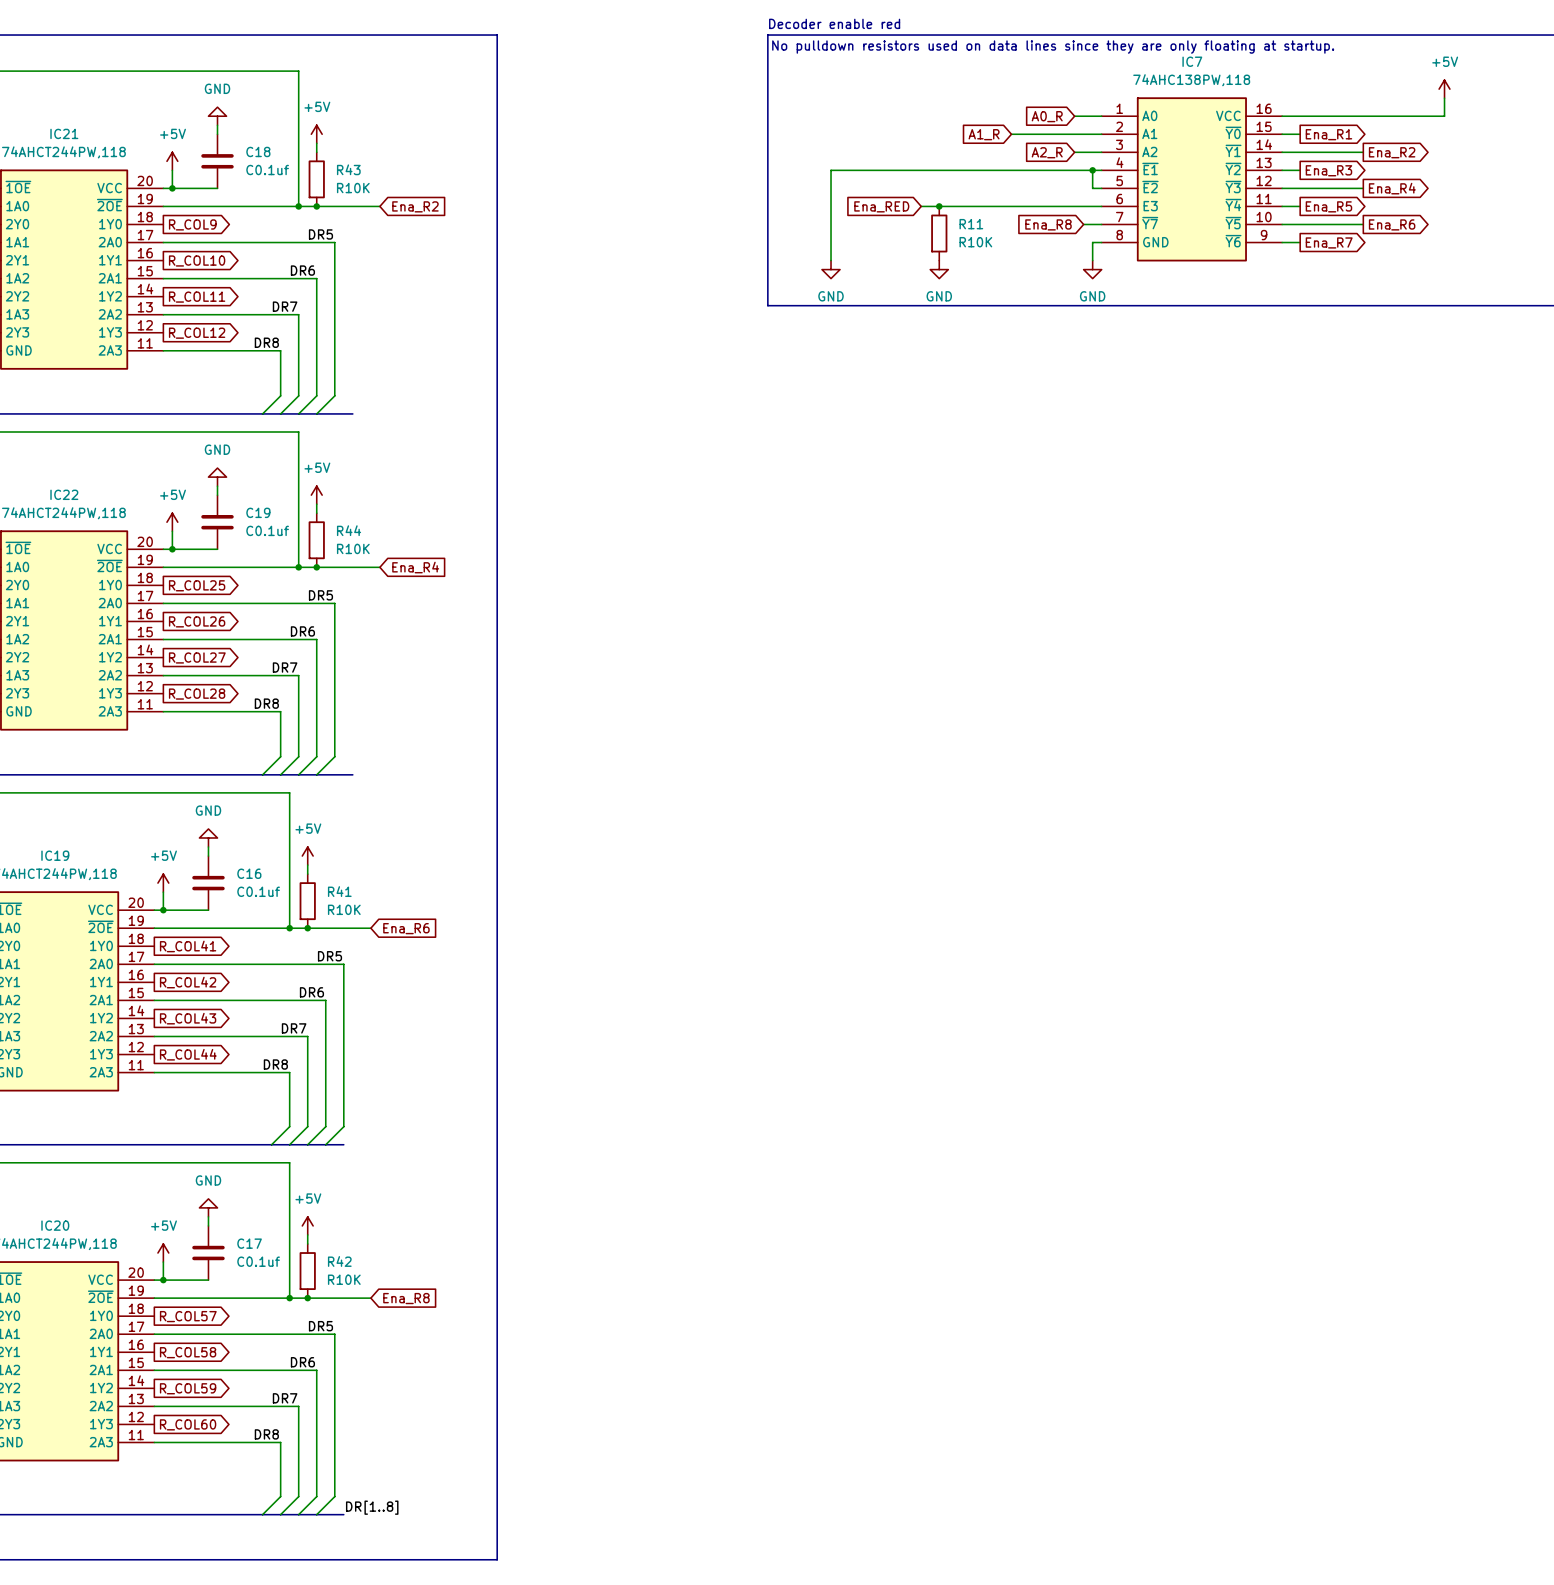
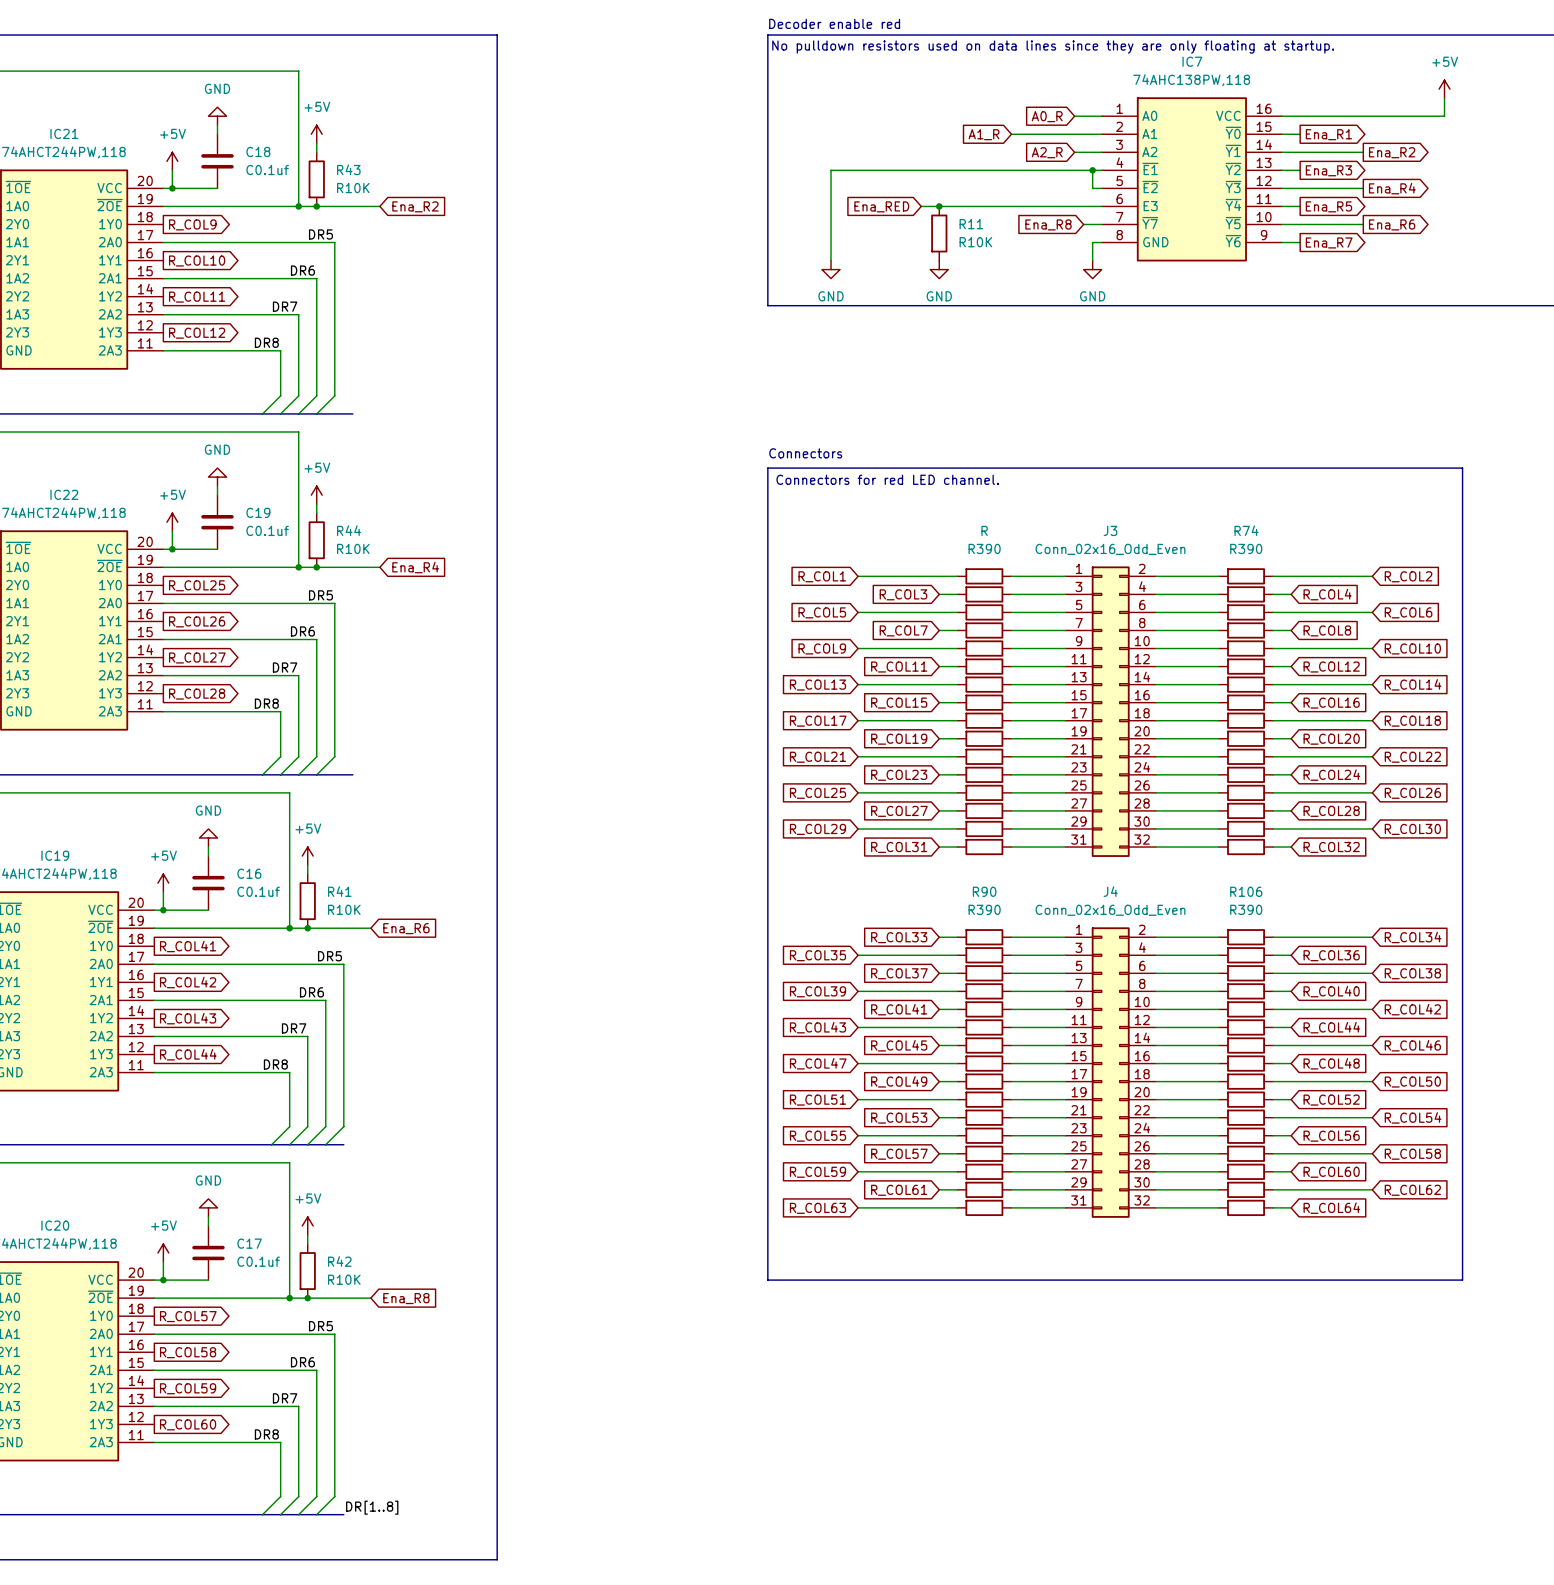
text: none -> Connectors (805, 453)
line: none -> (767, 468) (1462, 468) (1462, 1280) (767, 1280) (767, 468)
text: none -> Connectors for red LED channel. (887, 479)
global label: none -> R_COL1 (822, 576)
wire: none -> (858, 576) (957, 576)
R: none -> R390 (984, 576)
wire: none -> (1011, 576) (1065, 576)
wire: none -> (1155, 576) (1218, 576)
R74: none -> R390 (1246, 576)
wire: none -> (1273, 576) (1372, 576)
global label: none -> R_COL2 (1408, 576)
global label: none -> R_COL3 (903, 594)
wire: none -> (939, 594) (957, 594)
part: none -> (984, 594)
wire: none -> (1011, 594) (1065, 594)
wire: none -> (1155, 594) (1218, 594)
part: none -> (1246, 594)
wire: none -> (1273, 594) (1291, 594)
global label: none -> R_COL4 (1327, 594)
global label: none -> R_COL5 (822, 612)
wire: none -> (858, 612) (957, 612)
part: none -> (984, 612)
wire: none -> (1011, 612) (1065, 612)
wire: none -> (1155, 612) (1218, 612)
part: none -> (1246, 612)
wire: none -> (1273, 612) (1372, 612)
global label: none -> R_COL6 (1408, 612)
global label: none -> R_COL7 (903, 630)
wire: none -> (939, 630) (957, 630)
part: none -> (984, 630)
wire: none -> (1011, 630) (1065, 630)
wire: none -> (1155, 630) (1218, 630)
part: none -> (1246, 630)
wire: none -> (1273, 630) (1291, 630)
global label: none -> R_COL8 (1327, 630)
global label: none -> R_COL9 (822, 648)
wire: none -> (858, 648) (957, 648)
part: none -> (984, 648)
wire: none -> (1011, 648) (1065, 648)
wire: none -> (1155, 648) (1218, 648)
part: none -> (1246, 648)
wire: none -> (1273, 648) (1372, 648)
global label: none -> R_COL10 (1412, 648)
wire: none -> (939, 666) (957, 666)
part: none -> (984, 666)
wire: none -> (1011, 666) (1065, 666)
wire: none -> (1155, 666) (1218, 666)
part: none -> (1246, 666)
wire: none -> (1273, 666) (1291, 666)
global label: none -> R_COL11 (899, 667)
global label: none -> R_COL12 (1331, 667)
wire: none -> (858, 684) (957, 684)
part: none -> (984, 684)
wire: none -> (1011, 684) (1065, 684)
wire: none -> (1155, 684) (1218, 684)
part: none -> (1246, 684)
wire: none -> (1273, 684) (1372, 684)
global label: none -> R_COL14 (1413, 684)
global label: none -> R_COL13 (817, 685)
wire: none -> (939, 702) (957, 702)
part: none -> (984, 702)
wire: none -> (1011, 702) (1065, 702)
wire: none -> (1155, 702) (1218, 702)
part: none -> (1246, 702)
wire: none -> (1273, 702) (1291, 702)
global label: none -> R_COL15 (899, 703)
global label: none -> R_COL16 (1331, 703)
J3: none -> Conn_02x16_Odd_Even (1110, 711)
wire: none -> (858, 720) (957, 720)
part: none -> (984, 720)
wire: none -> (1011, 720) (1065, 720)
wire: none -> (1155, 720) (1218, 720)
part: none -> (1246, 720)
wire: none -> (1273, 720) (1372, 720)
global label: none -> R_COL17 (818, 721)
global label: none -> R_COL18 (1412, 721)
wire: none -> (939, 738) (957, 738)
part: none -> (984, 738)
wire: none -> (1011, 738) (1065, 738)
wire: none -> (1155, 738) (1218, 738)
part: none -> (1246, 738)
wire: none -> (1273, 738) (1291, 738)
global label: none -> R_COL19 (899, 739)
global label: none -> R_COL20 (1331, 739)
wire: none -> (858, 756) (957, 756)
part: none -> (984, 756)
wire: none -> (1011, 756) (1065, 756)
wire: none -> (1155, 756) (1218, 756)
part: none -> (1246, 756)
wire: none -> (1273, 756) (1372, 756)
global label: none -> R_COL21 (817, 757)
global label: none -> R_COL22 (1412, 757)
wire: none -> (939, 774) (957, 774)
part: none -> (984, 774)
wire: none -> (1011, 774) (1065, 774)
wire: none -> (1155, 774) (1218, 774)
part: none -> (1246, 774)
wire: none -> (1273, 774) (1291, 774)
global label: none -> R_COL23 (899, 775)
global label: none -> R_COL24 (1331, 775)
wire: none -> (858, 792) (957, 792)
part: none -> (984, 792)
wire: none -> (1011, 792) (1065, 792)
wire: none -> (1155, 792) (1218, 792)
part: none -> (1246, 792)
wire: none -> (1273, 792) (1372, 792)
global label: none -> R_COL25 (817, 793)
global label: none -> R_COL26 (1412, 793)
wire: none -> (939, 810) (957, 810)
part: none -> (984, 810)
wire: none -> (1011, 810) (1065, 810)
wire: none -> (1155, 810) (1218, 810)
part: none -> (1246, 810)
wire: none -> (1273, 810) (1291, 810)
global label: none -> R_COL27 (899, 811)
global label: none -> R_COL28 (1331, 811)
wire: none -> (858, 828) (957, 828)
part: none -> (984, 828)
wire: none -> (1011, 828) (1065, 828)
wire: none -> (1155, 828) (1218, 828)
part: none -> (1246, 828)
wire: none -> (1273, 828) (1372, 828)
global label: none -> R_COL29 (817, 829)
global label: none -> R_COL30 (1412, 829)
global label: none -> R_COL31 (899, 847)
wire: none -> (939, 847) (957, 847)
part: none -> (984, 847)
wire: none -> (1011, 847) (1065, 847)
wire: none -> (1155, 847) (1218, 847)
part: none -> (1246, 847)
wire: none -> (1273, 847) (1291, 847)
global label: none -> R_COL32 (1331, 847)
global label: none -> R_COL33 (899, 937)
wire: none -> (939, 937) (957, 937)
R90: none -> R390 (984, 937)
wire: none -> (1011, 937) (1065, 937)
wire: none -> (1155, 937) (1218, 937)
R106: none -> R390 (1246, 937)
wire: none -> (1273, 937) (1372, 937)
global label: none -> R_COL34 (1413, 937)
global label: none -> R_COL35 (817, 955)
wire: none -> (858, 955) (957, 955)
part: none -> (984, 955)
wire: none -> (1011, 955) (1065, 955)
wire: none -> (1155, 955) (1218, 955)
part: none -> (1246, 955)
wire: none -> (1273, 955) (1291, 955)
global label: none -> R_COL36 (1331, 955)
global label: none -> R_COL37 (899, 973)
wire: none -> (939, 973) (957, 973)
part: none -> (984, 973)
wire: none -> (1011, 973) (1065, 973)
wire: none -> (1155, 973) (1218, 973)
part: none -> (1246, 973)
wire: none -> (1273, 973) (1372, 973)
global label: none -> R_COL38 (1412, 973)
global label: none -> R_COL39 (817, 991)
wire: none -> (858, 991) (957, 991)
part: none -> (984, 991)
wire: none -> (1011, 991) (1065, 991)
wire: none -> (1155, 991) (1218, 991)
part: none -> (1246, 991)
wire: none -> (1273, 991) (1291, 991)
global label: none -> R_COL40 (1331, 991)
global label: none -> R_COL41 (899, 1009)
wire: none -> (939, 1009) (957, 1009)
part: none -> (984, 1009)
wire: none -> (1011, 1009) (1065, 1009)
wire: none -> (1155, 1009) (1218, 1009)
part: none -> (1246, 1009)
wire: none -> (1273, 1009) (1372, 1009)
global label: none -> R_COL42 (1412, 1009)
global label: none -> R_COL43 (817, 1027)
wire: none -> (858, 1027) (957, 1027)
part: none -> (984, 1027)
wire: none -> (1011, 1027) (1065, 1027)
wire: none -> (1155, 1027) (1218, 1027)
part: none -> (1246, 1027)
wire: none -> (1273, 1027) (1291, 1027)
global label: none -> R_COL44 (1331, 1027)
global label: none -> R_COL45 (899, 1045)
wire: none -> (939, 1045) (957, 1045)
part: none -> (984, 1045)
wire: none -> (1011, 1045) (1065, 1045)
wire: none -> (1155, 1045) (1218, 1045)
part: none -> (1246, 1045)
wire: none -> (1273, 1045) (1372, 1045)
global label: none -> R_COL46 (1412, 1045)
global label: none -> R_COL47 (818, 1063)
wire: none -> (858, 1063) (957, 1063)
part: none -> (984, 1063)
wire: none -> (1011, 1063) (1065, 1063)
wire: none -> (1155, 1063) (1218, 1063)
part: none -> (1246, 1063)
wire: none -> (1273, 1063) (1291, 1063)
global label: none -> R_COL48 (1331, 1063)
J4: none -> Conn_02x16_Odd_Even (1110, 1072)
global label: none -> R_COL49 (899, 1081)
wire: none -> (939, 1081) (957, 1081)
part: none -> (984, 1081)
wire: none -> (1011, 1081) (1065, 1081)
wire: none -> (1155, 1081) (1218, 1081)
part: none -> (1246, 1081)
wire: none -> (1273, 1081) (1372, 1081)
global label: none -> R_COL50 (1412, 1082)
wire: none -> (858, 1099) (957, 1099)
part: none -> (984, 1099)
wire: none -> (1011, 1099) (1065, 1099)
wire: none -> (1155, 1099) (1218, 1099)
part: none -> (1246, 1099)
wire: none -> (1273, 1099) (1291, 1099)
global label: none -> R_COL51 (817, 1100)
global label: none -> R_COL52 (1331, 1100)
wire: none -> (939, 1117) (957, 1117)
part: none -> (984, 1117)
wire: none -> (1011, 1117) (1065, 1117)
wire: none -> (1155, 1117) (1218, 1117)
part: none -> (1246, 1117)
wire: none -> (1273, 1117) (1372, 1117)
global label: none -> R_COL54 (1413, 1117)
global label: none -> R_COL53 (899, 1118)
wire: none -> (858, 1135) (957, 1135)
part: none -> (984, 1135)
wire: none -> (1011, 1135) (1065, 1135)
wire: none -> (1155, 1135) (1218, 1135)
part: none -> (1246, 1135)
wire: none -> (1273, 1135) (1291, 1135)
global label: none -> R_COL55 (817, 1136)
global label: none -> R_COL56 (1331, 1136)
wire: none -> (939, 1153) (957, 1153)
part: none -> (984, 1153)
wire: none -> (1011, 1153) (1065, 1153)
wire: none -> (1155, 1153) (1218, 1153)
part: none -> (1246, 1153)
wire: none -> (1273, 1153) (1372, 1153)
global label: none -> R_COL57 (899, 1154)
global label: none -> R_COL58 (1412, 1154)
wire: none -> (858, 1171) (957, 1171)
part: none -> (984, 1171)
wire: none -> (1011, 1171) (1065, 1171)
wire: none -> (1155, 1171) (1218, 1171)
part: none -> (1246, 1171)
wire: none -> (1273, 1171) (1291, 1171)
global label: none -> R_COL59 (817, 1172)
global label: none -> R_COL60 (1331, 1172)
wire: none -> (939, 1189) (957, 1189)
part: none -> (984, 1189)
wire: none -> (1011, 1189) (1065, 1189)
wire: none -> (1155, 1189) (1218, 1189)
part: none -> (1246, 1189)
wire: none -> (1273, 1189) (1372, 1189)
global label: none -> R_COL61 (899, 1190)
global label: none -> R_COL62 (1412, 1190)
wire: none -> (858, 1207) (957, 1207)
part: none -> (984, 1207)
wire: none -> (1011, 1207) (1065, 1207)
wire: none -> (1155, 1207) (1218, 1207)
part: none -> (1246, 1207)
wire: none -> (1273, 1207) (1291, 1207)
global label: none -> R_COL63 (817, 1208)
global label: none -> R_COL64 (1331, 1208)

